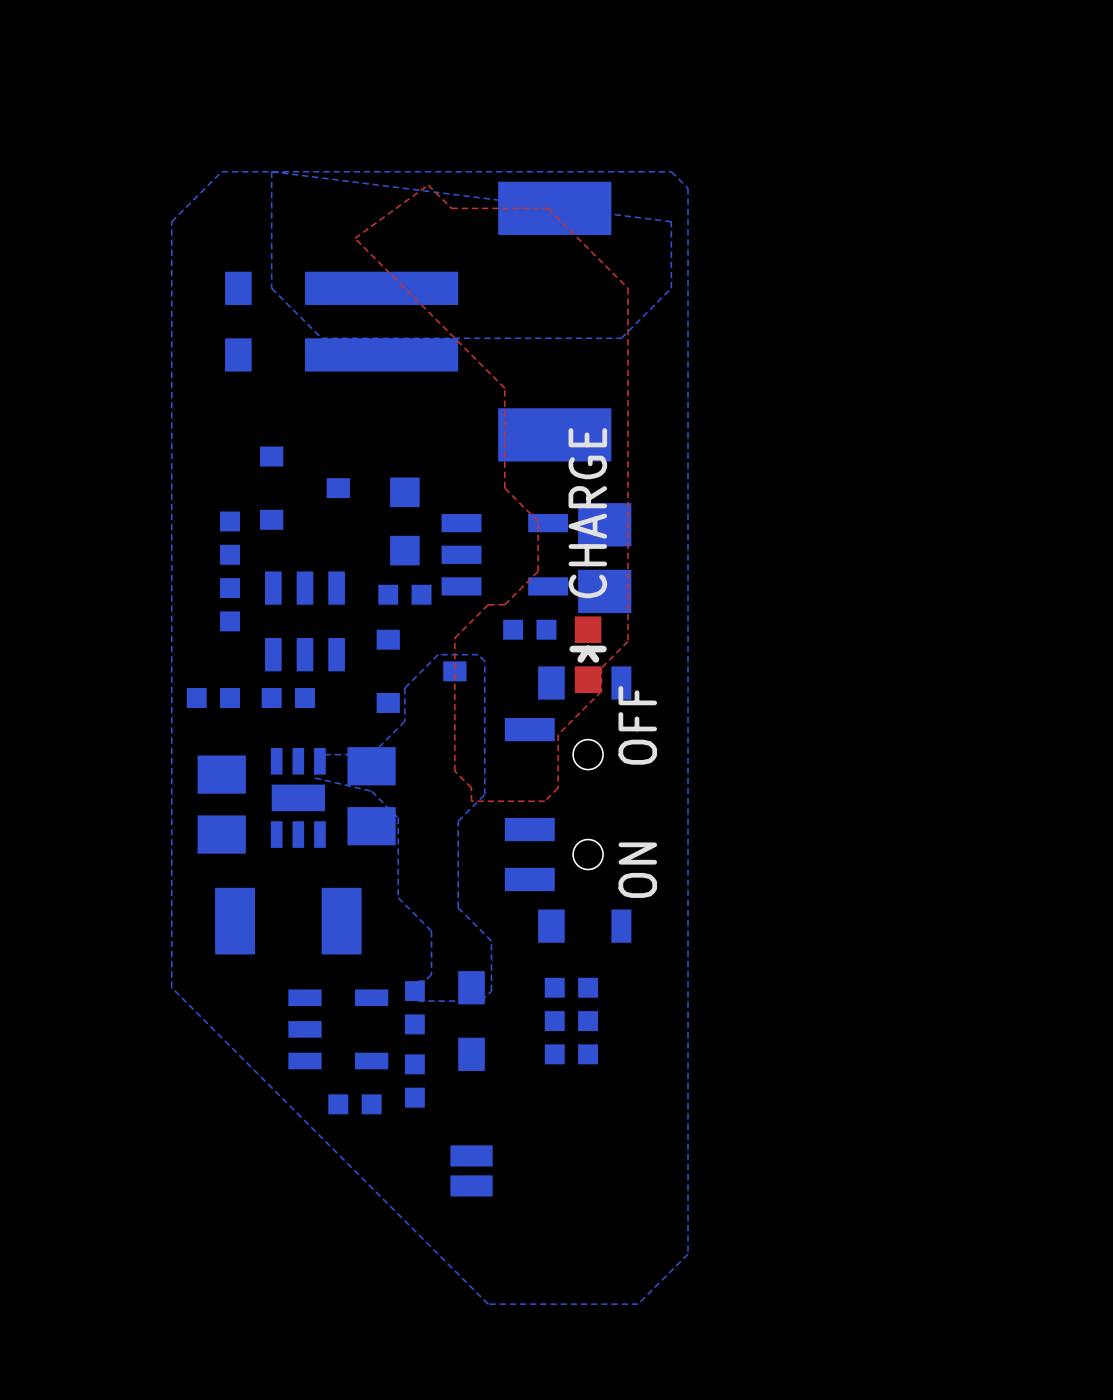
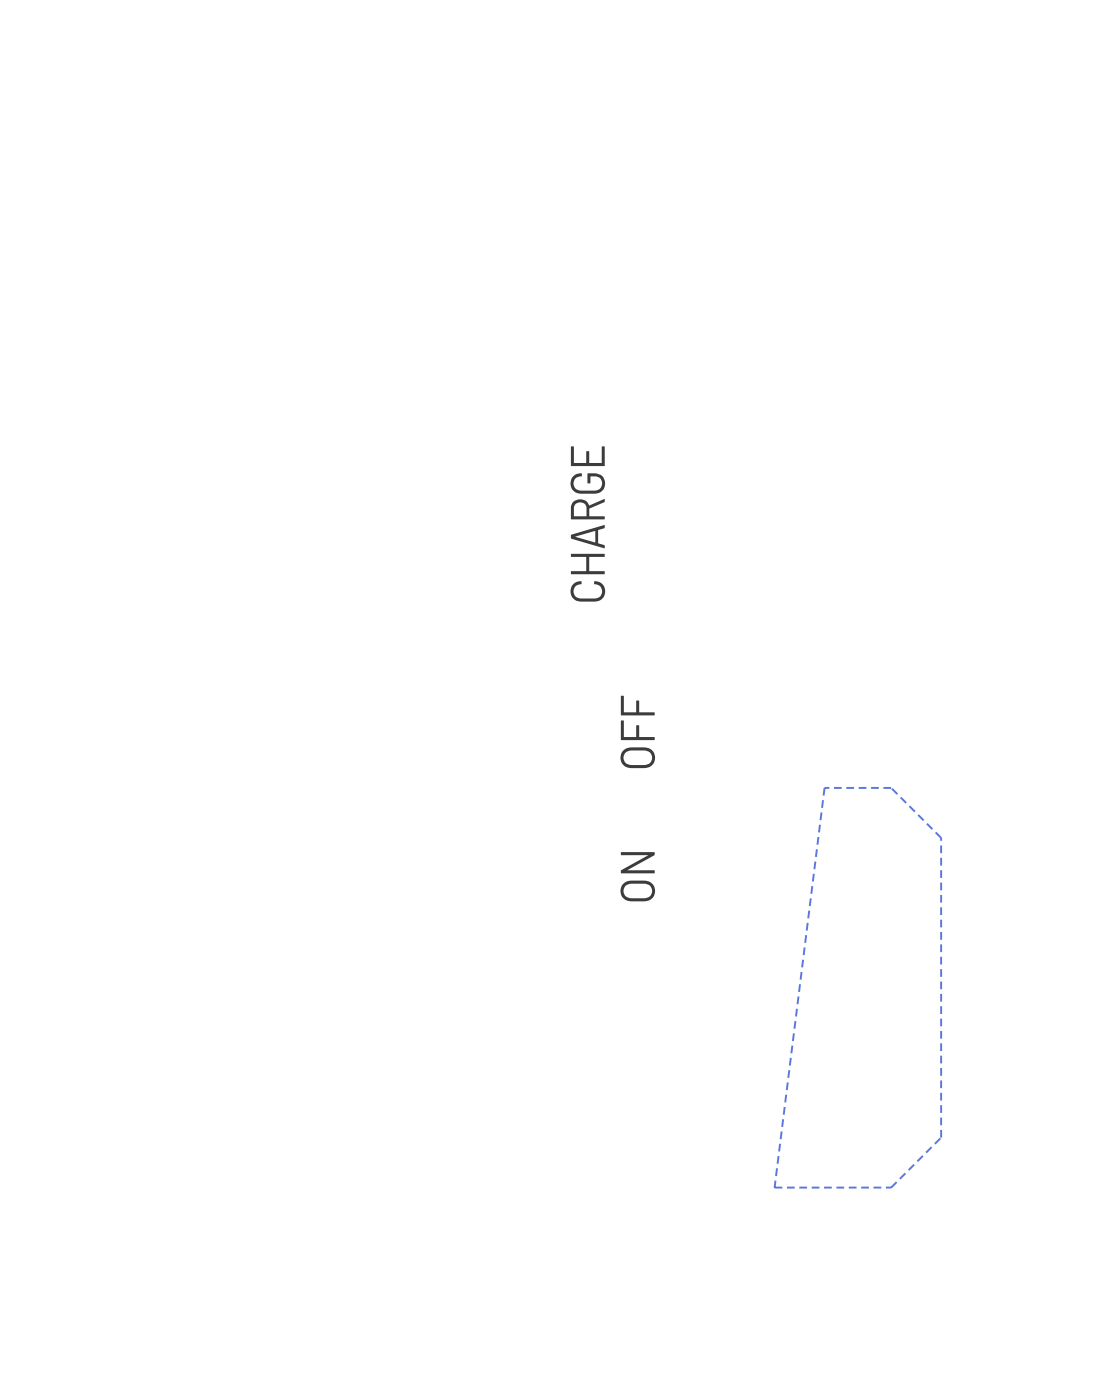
bottom zone outline: (221, 171) (171, 221) (171, 987) (488, 1304) (638, 1304) (688, 1254) (688, 188) (671, 171) (221, 171) -> none
bottom zone outline: (271, 171) (671, 221) (671, 288) (621, 338) (321, 338) (271, 288) (271, 171) -> none
top zone outline: (428, 185) (354, 238) (504, 388) (504, 488) (538, 521) (538, 571) (504, 604) (488, 604) (454, 638) (454, 771) (471, 787) (471, 801) (544, 801) (558, 787) (558, 734) (601, 691) (601, 668) (628, 641) (628, 288) (548, 208) (451, 208) (428, 185) -> none
part: (238, 321) -> none
part: (458, 321) -> none
part: (304, 488) -> none
part: (404, 521) -> none
part: (230, 538) -> none
part: (504, 554) -> none
part: (604, 558) -> none
part: (404, 594) -> none
part: (230, 604) -> none
part: (304, 621) -> none
part: (529, 629) -> none
bottom zone outline: (438, 654) (478, 654) (484, 661) (484, 794) (458, 821) (458, 907) (491, 941) (491, 991) (481, 1001) (418, 1001) (411, 994) (411, 987) (418, 981) (424, 981) (431, 974) (431, 931) (398, 897) (398, 817) (371, 791) (314, 777) (314, 747) (321, 754) (371, 754) (404, 721) (404, 688) (438, 654) -> none
part: (588, 654) -> none
part: (421, 671) -> none
part: (213, 697) -> none
part: (288, 697) -> none
bottom zone outline: none -> (824, 787) (774, 1187) (891, 1187) (941, 1137) (941, 837) (891, 787) (824, 787)
part: (371, 796) -> none
part: (298, 797) -> none
part: (221, 804) -> none
part: (568, 804) -> none
part: (288, 921) -> none
part: (571, 987) -> none
part: (414, 1007) -> none
part: (471, 1021) -> none
part: (571, 1021) -> none
part: (338, 1029) -> none
part: (571, 1054) -> none
part: (414, 1081) -> none
part: (354, 1104) -> none
part: (471, 1170) -> none

